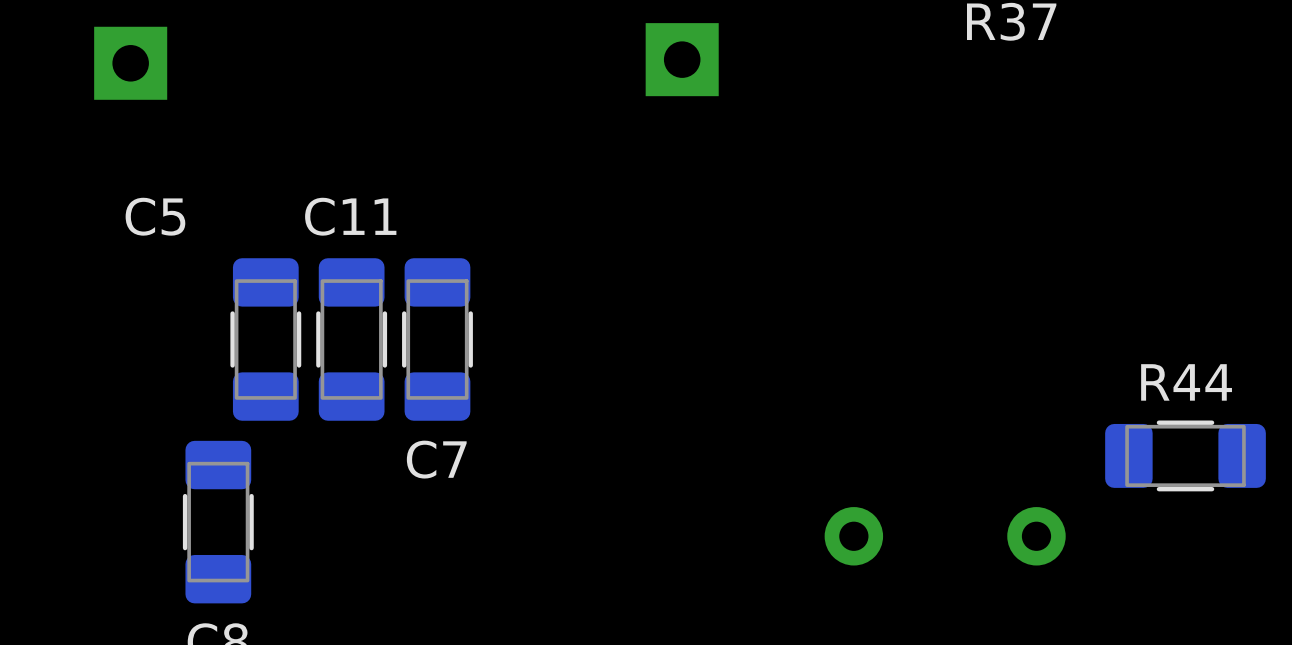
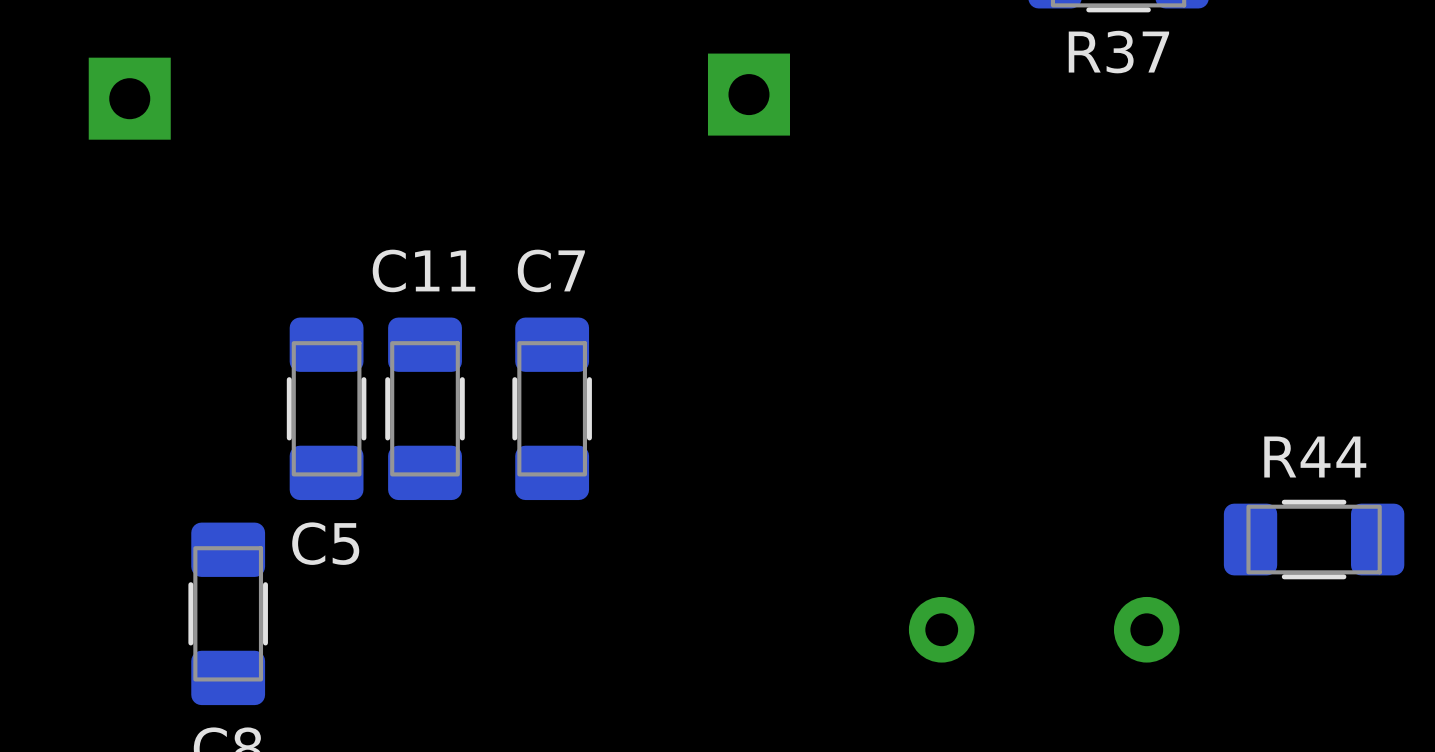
C5 name position: C5 (155, 216) -> C5 (325, 543)
C5 position: (265, 339) -> (326, 408)
C11 position: (351, 339) -> (425, 408)
C7 position: (437, 339) -> (552, 408)
C7 name position: C7 (436, 459) -> C7 (551, 270)

